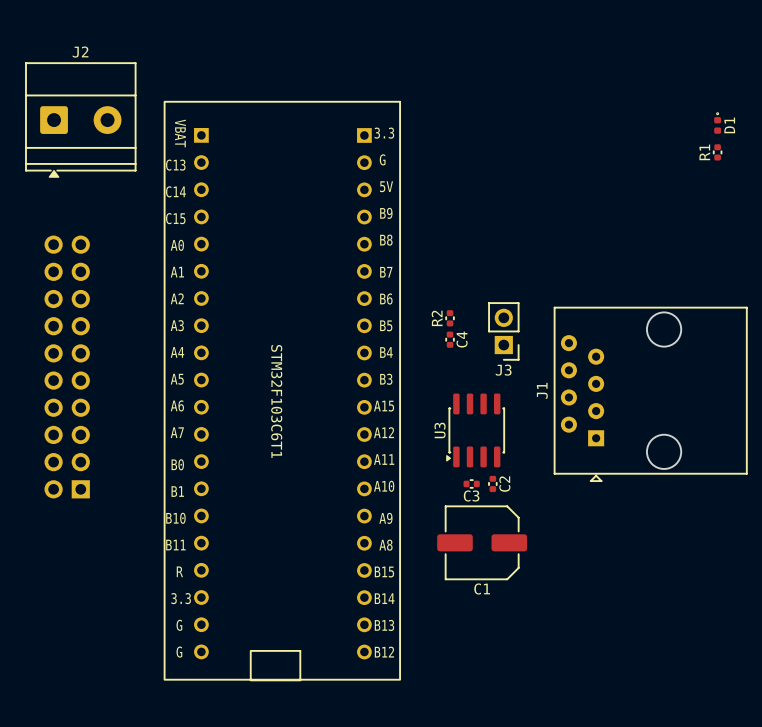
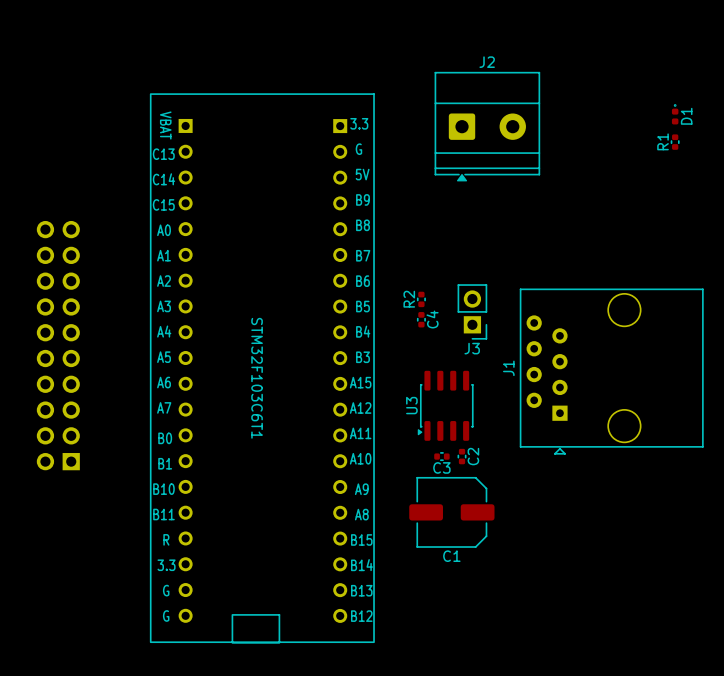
J2 position: (80, 120) -> (487, 126)

